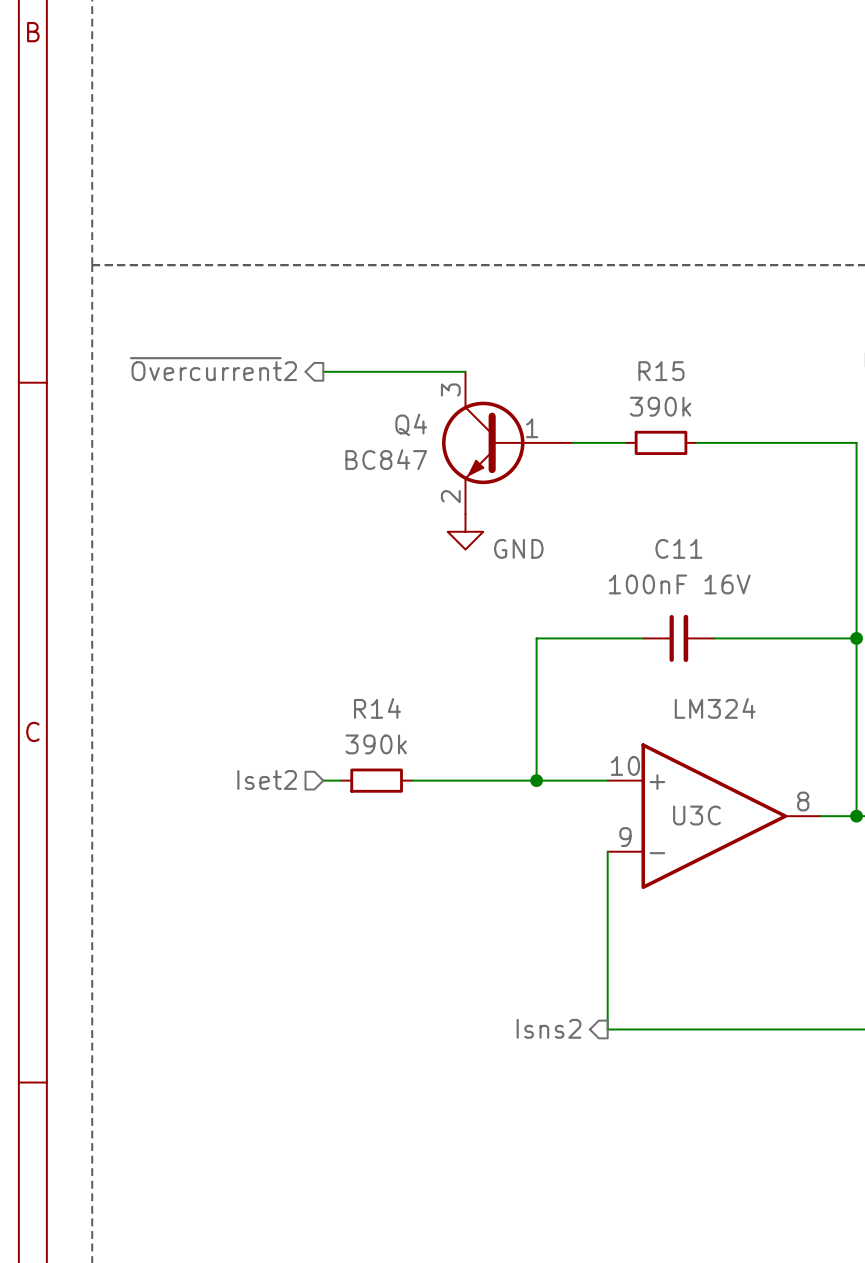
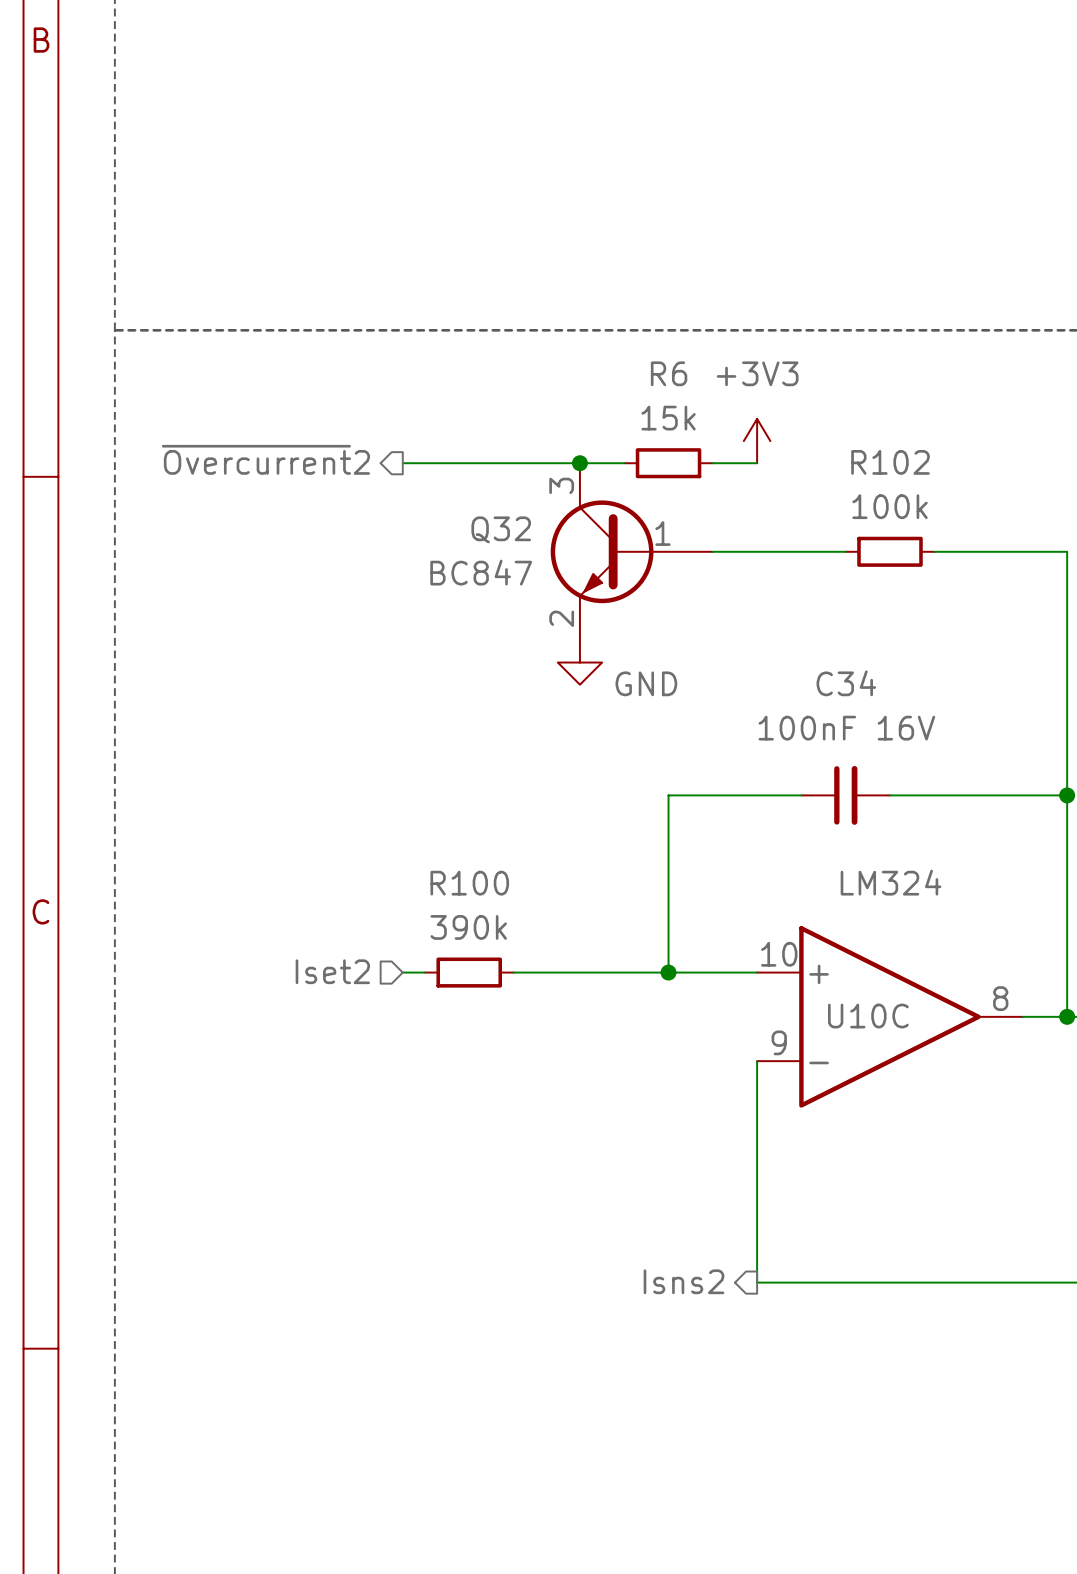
power symbol: none -> +3V3 (757, 441)
wire: none -> (579, 463) (624, 463)
junction: none -> (579, 463)
R6: none -> 15k (668, 463)
wire: none -> (712, 463) (757, 463)
Q4 name: Q4 (411, 424) -> Q32 (501, 529)
R15: 390k (661, 442) -> none
wire: (696, 442) (749, 442) -> (779, 551) (845, 551)
R102: none -> 100k (889, 551)
C11 name: C11 (678, 548) -> C34 (846, 683)
R14 name: R14 (377, 708) -> R100 (469, 883)
U3C name: U3C (696, 815) -> U10C (868, 1016)

